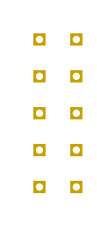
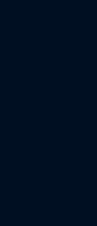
part: (39, 39) -> none
part: (76, 39) -> none
part: (39, 76) -> none
part: (76, 76) -> none
part: (39, 113) -> none
part: (76, 113) -> none
part: (39, 150) -> none
part: (76, 150) -> none
part: (39, 186) -> none
part: (76, 186) -> none

